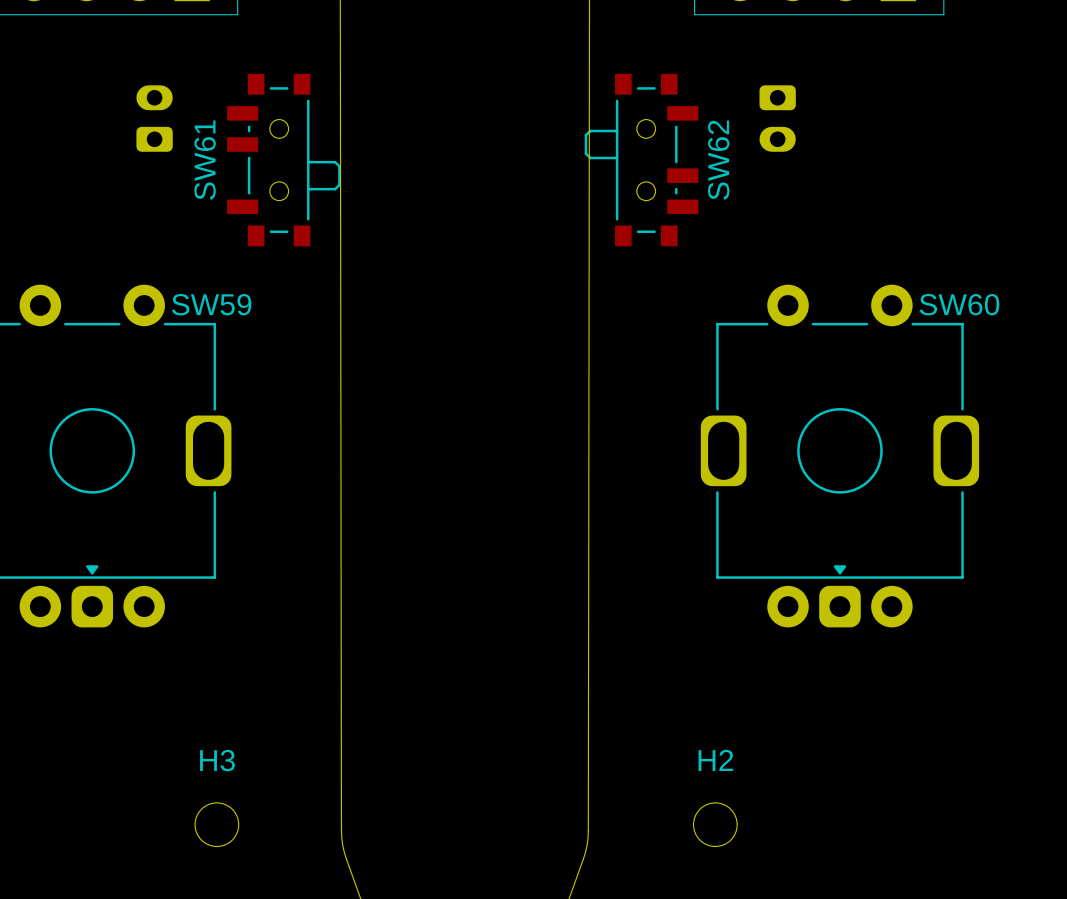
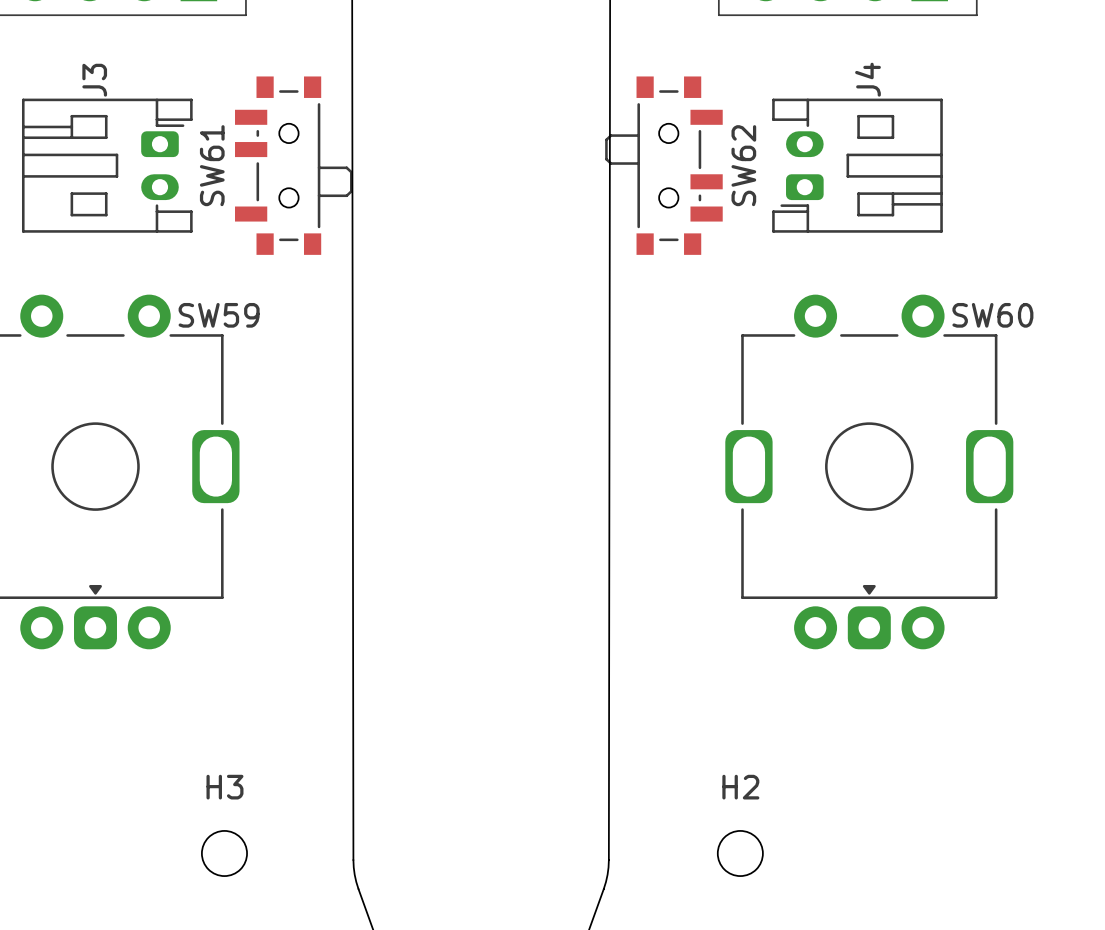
J3 side: bottom (154, 118) -> top (107, 165)
J4 side: bottom (777, 118) -> top (857, 165)

